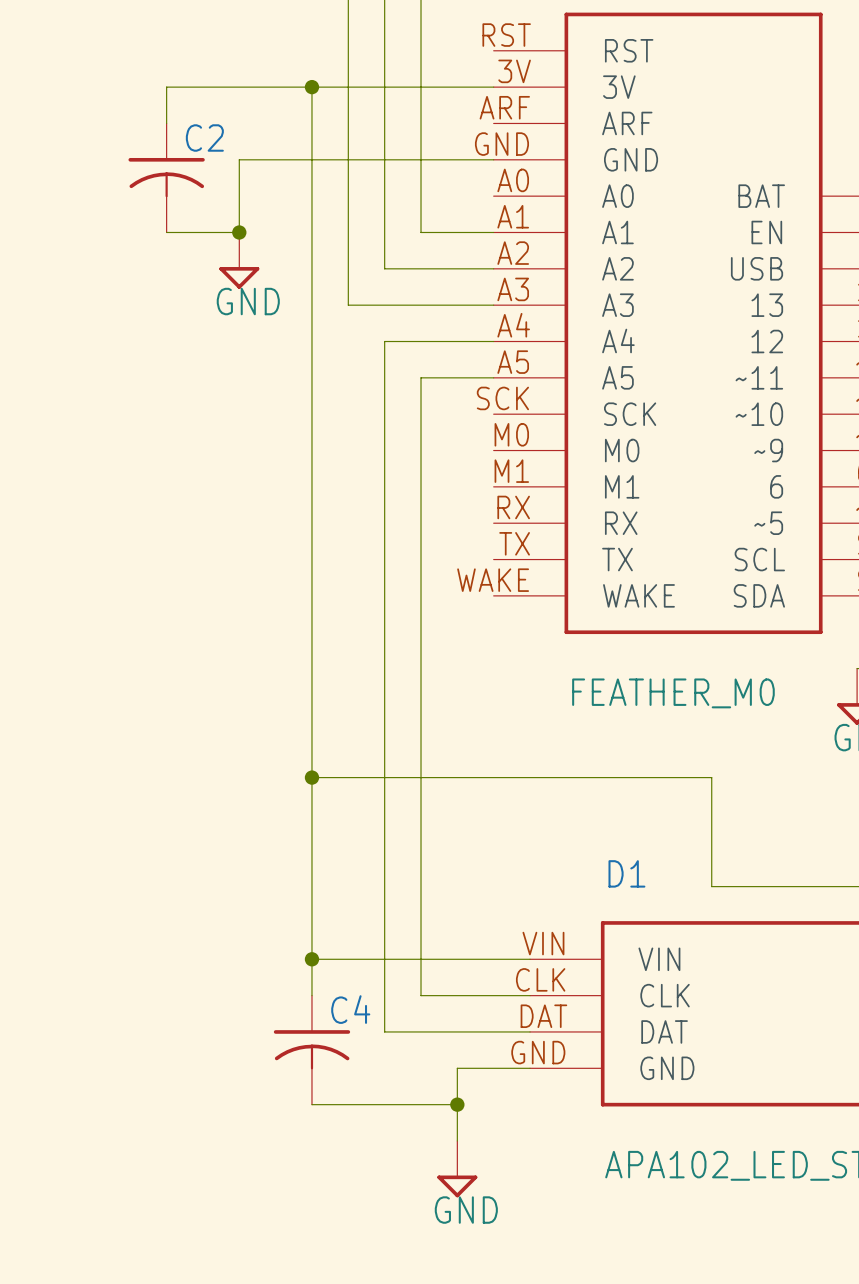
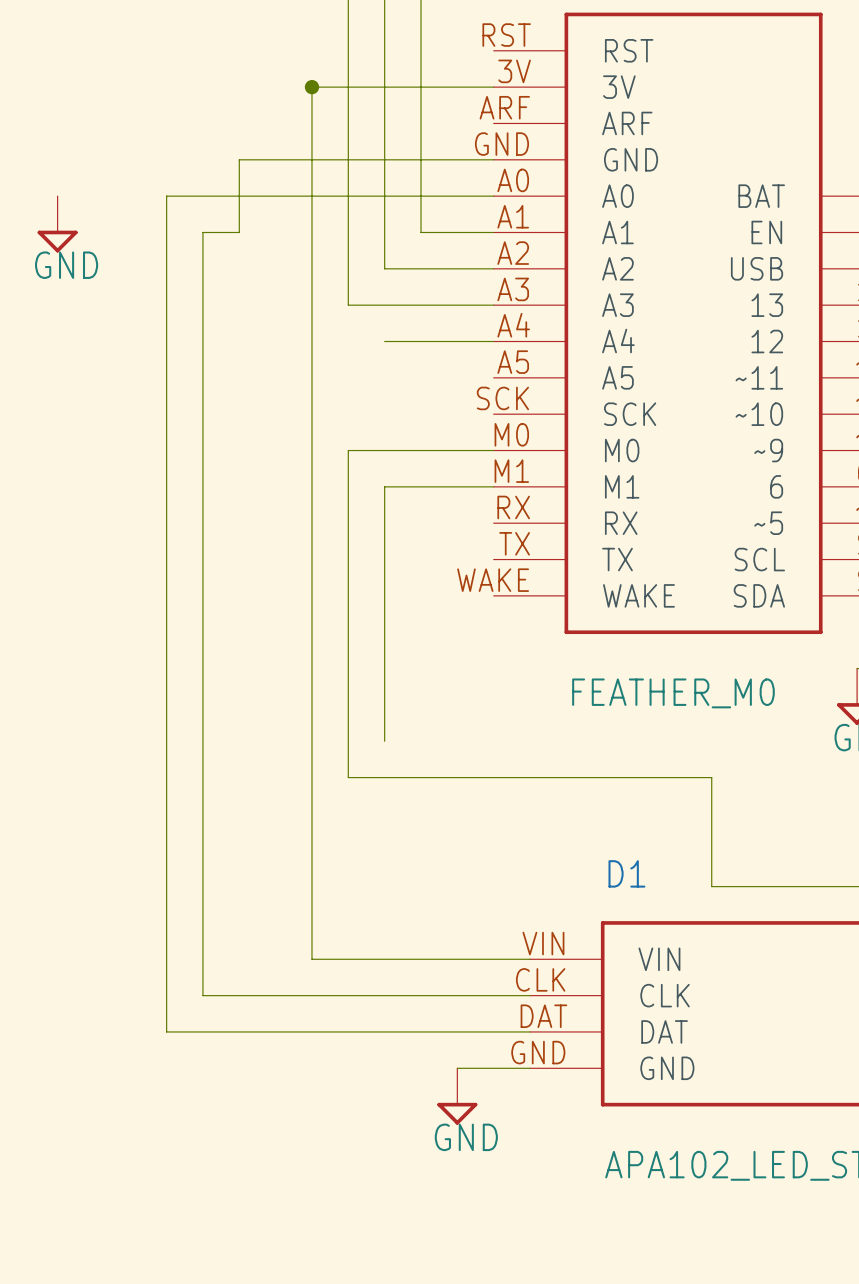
wire: (311, 87) (166, 87) (166, 123) -> none
C2: (166, 177) -> none
wire: (166, 232) (202, 232) -> none
junction: (239, 232) -> none
power symbol position: GND (239, 260) -> GND (57, 224)
wire: (384, 341) (384, 486) -> (493, 486) (384, 486)
wire: (493, 377) (421, 377) (421, 995) -> (202, 232) (202, 995) (421, 995)
wire: (384, 741) (384, 1031) -> (493, 196) (166, 196) (166, 1031) (384, 1031)
wire: (311, 777) (348, 777) -> (493, 450) (348, 450) (348, 777)
junction: (311, 777) -> none
wire: (311, 959) (311, 995) -> none
junction: (311, 959) -> none
C4: (311, 1050) -> none
wire: (311, 1104) (457, 1104) -> none
junction: (457, 1104) -> none
power symbol position: GND (457, 1169) -> GND (457, 1096)

